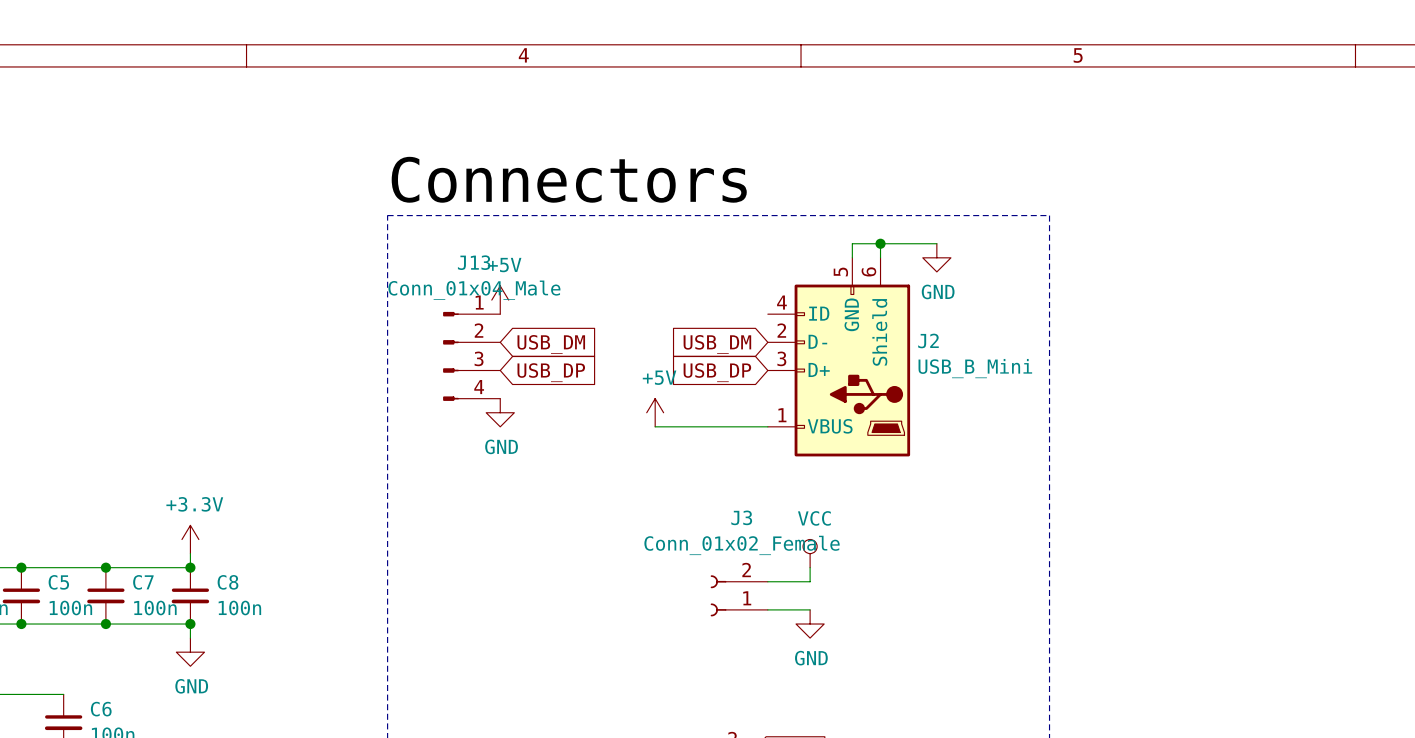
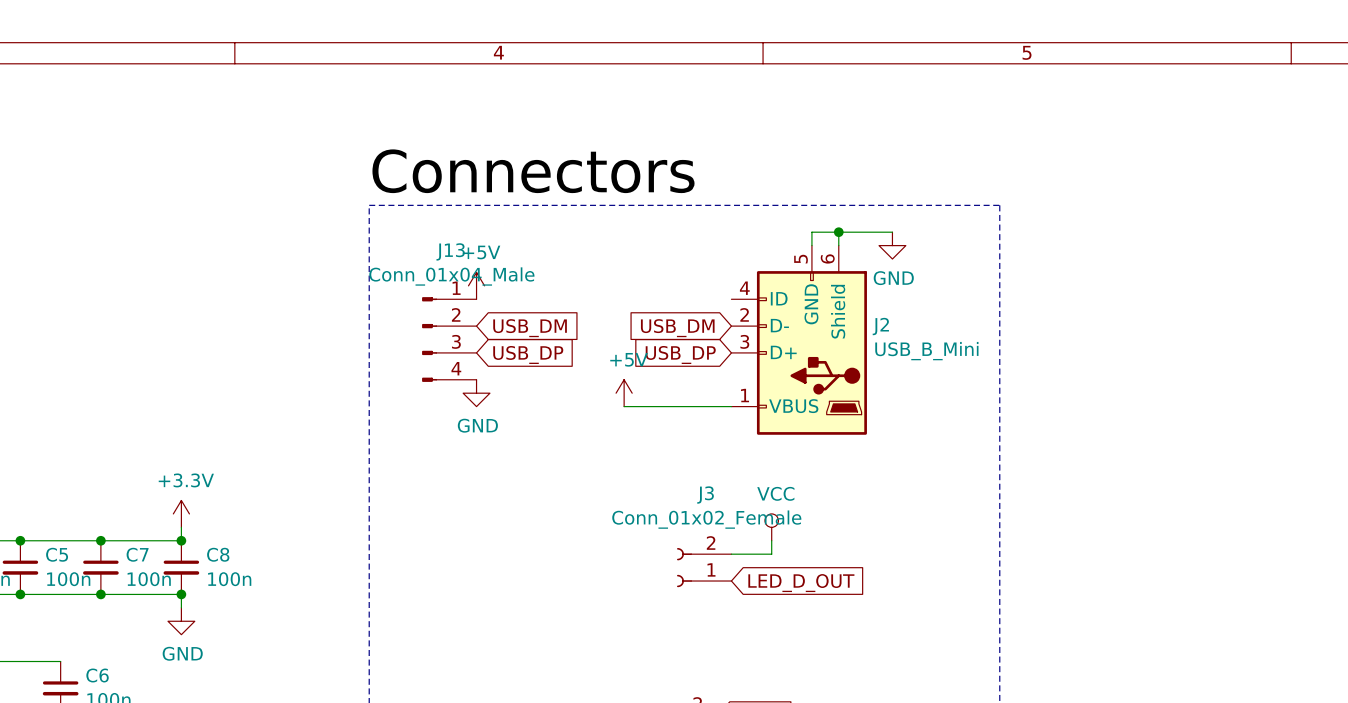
wire: (767, 609) (810, 609) -> none
global label: none -> LED_D_OUT (801, 583)
power symbol: GND (810, 624) -> none

